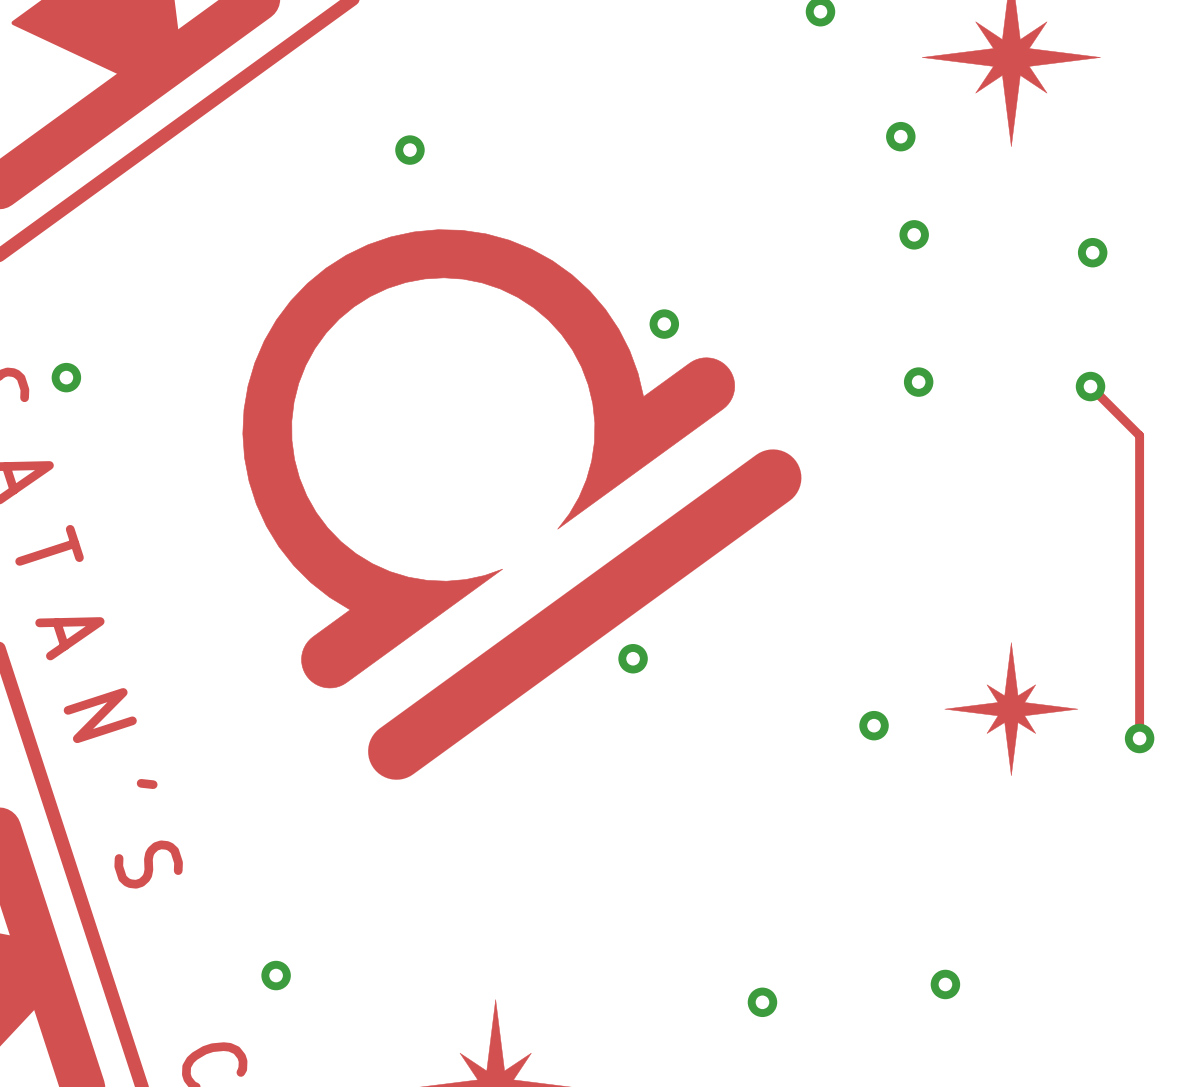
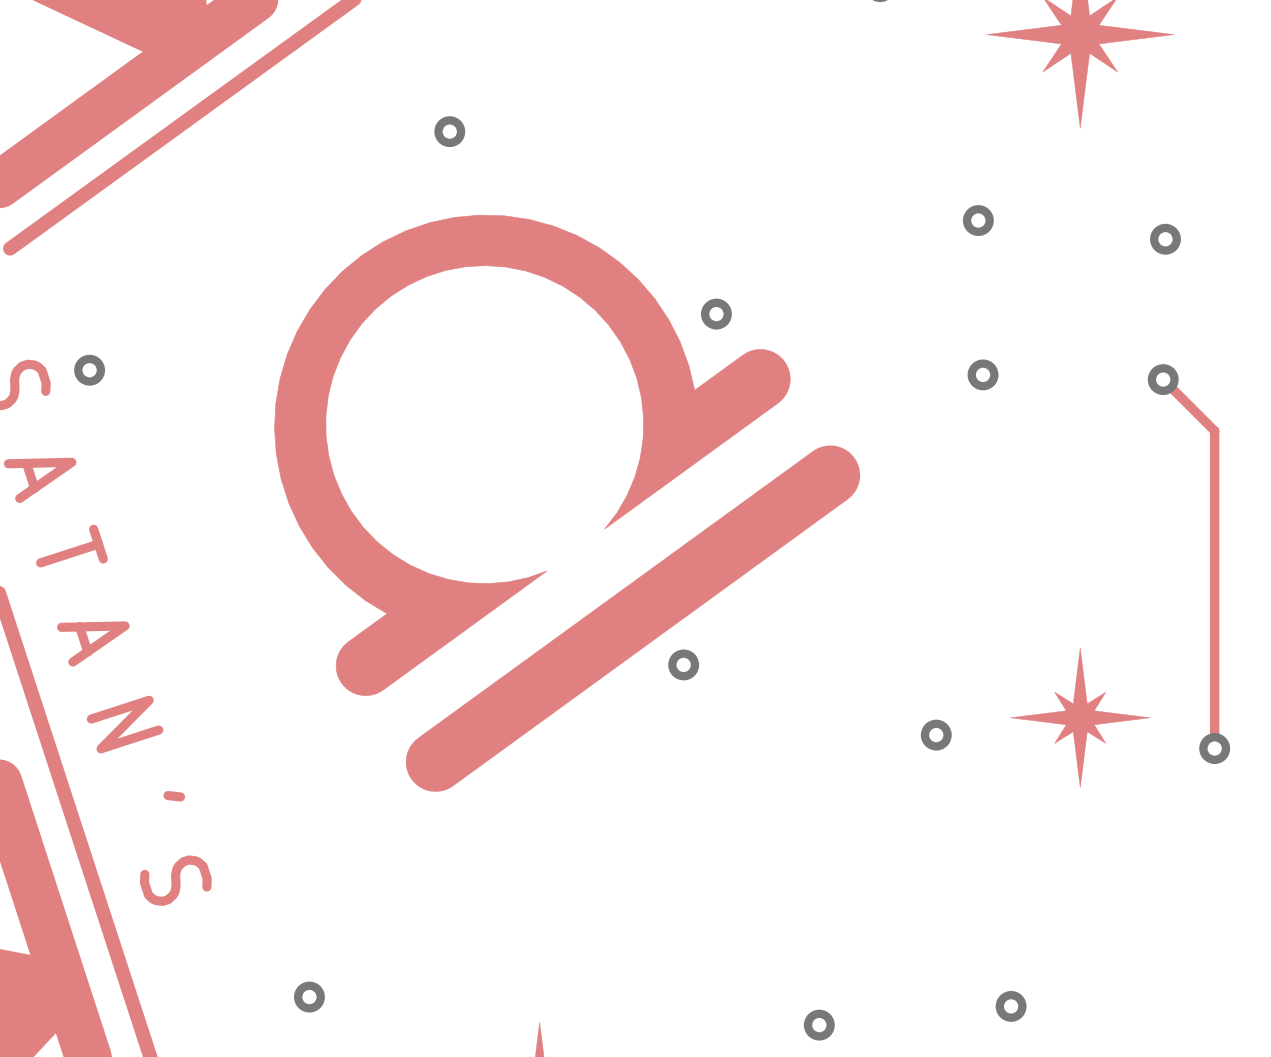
via: (900, 136) -> none

